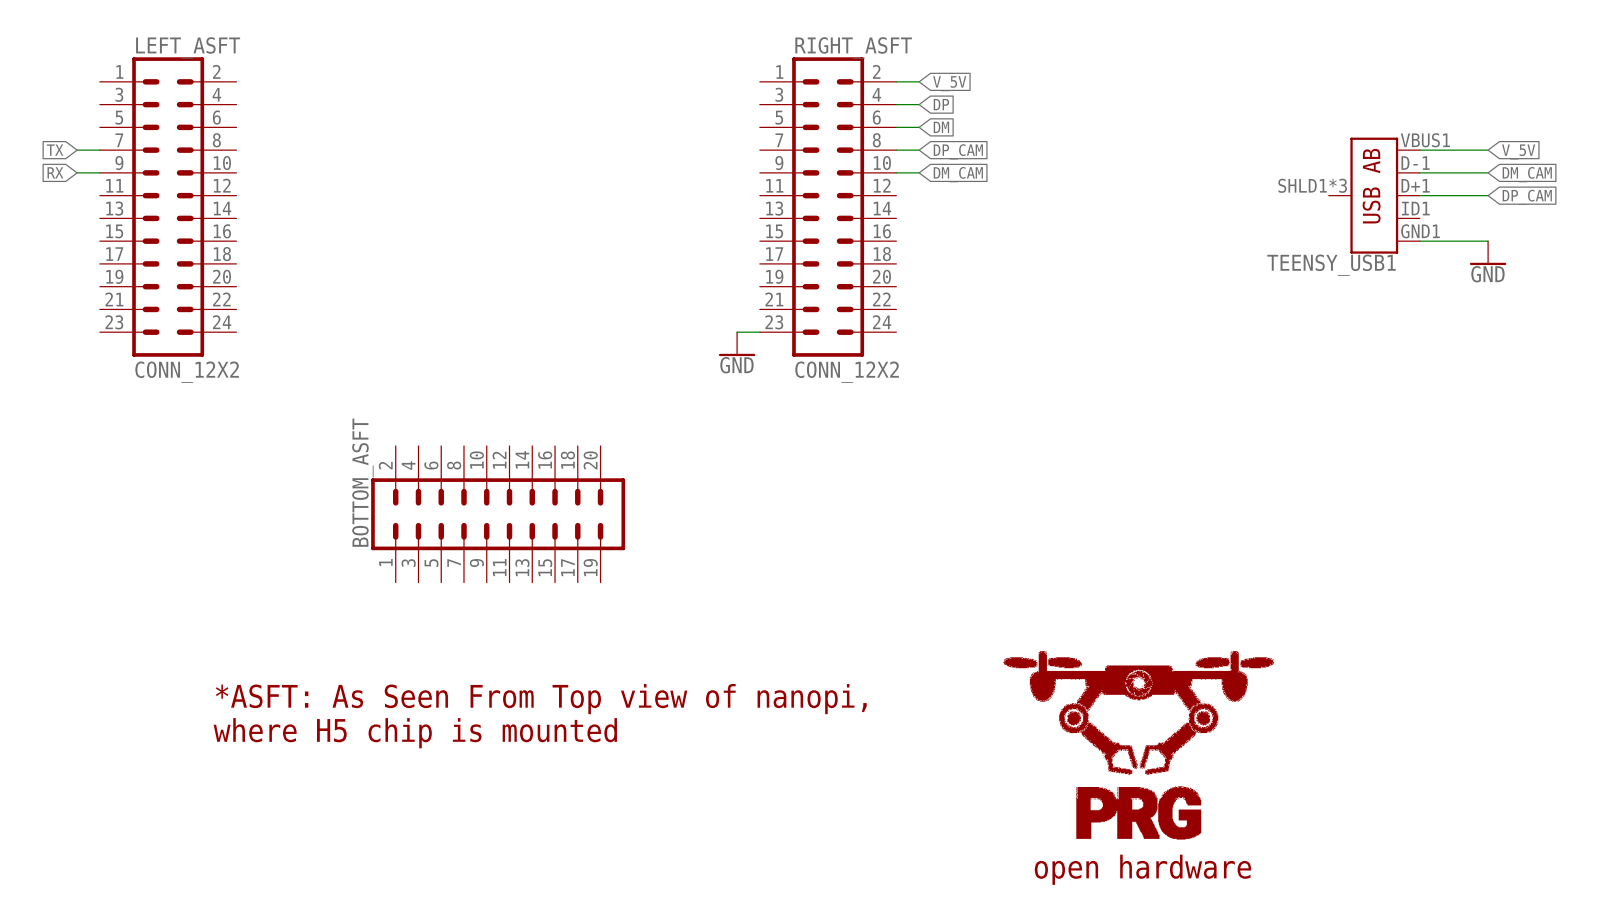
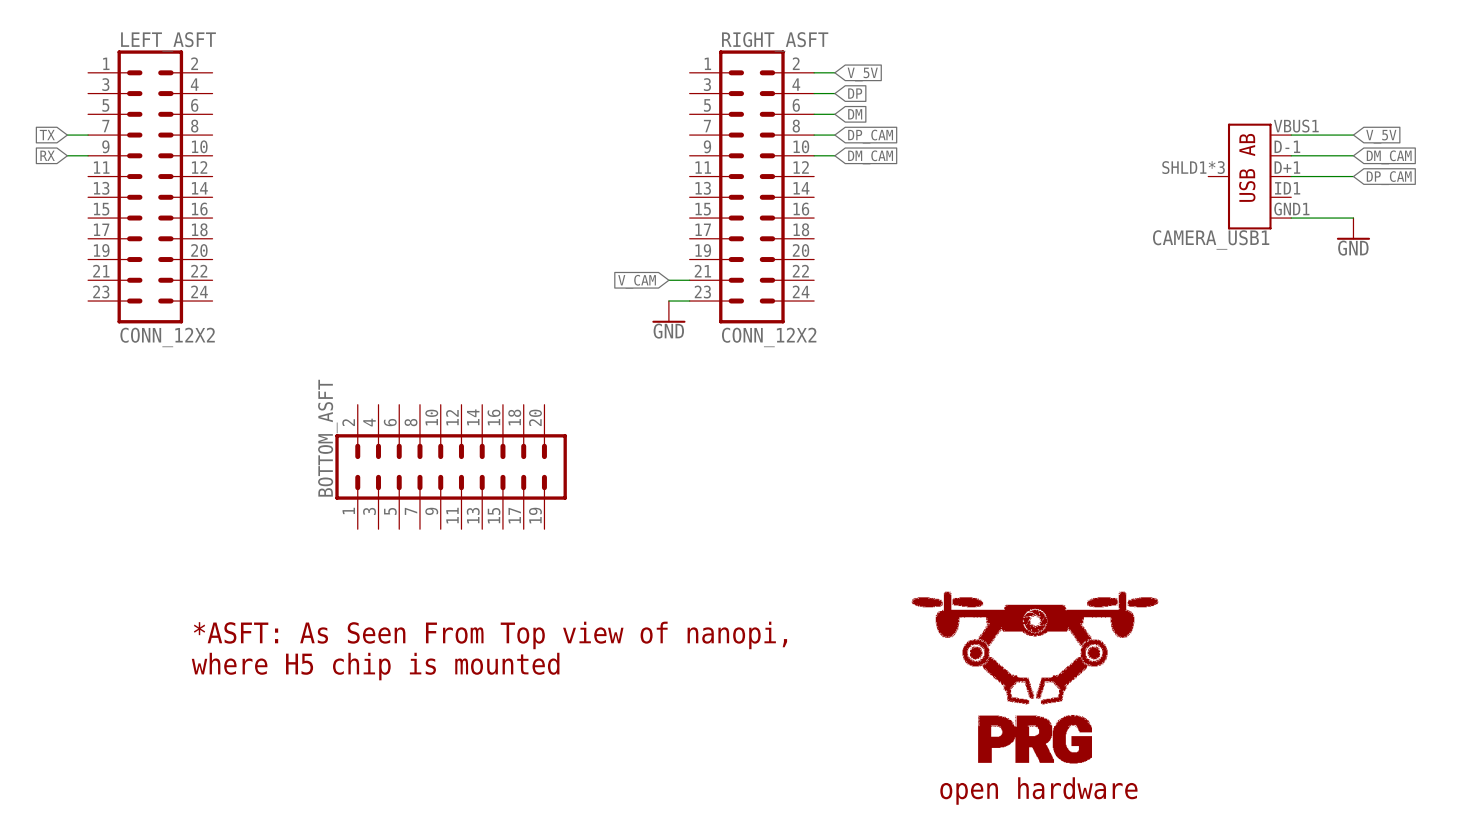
TEENSY_USB1 name: TEENSY_USB1 (1331, 265) -> CAMERA_USB1 (1211, 239)
wire: none -> (668, 280) (689, 280)
global label: none -> V_CAM (637, 281)

